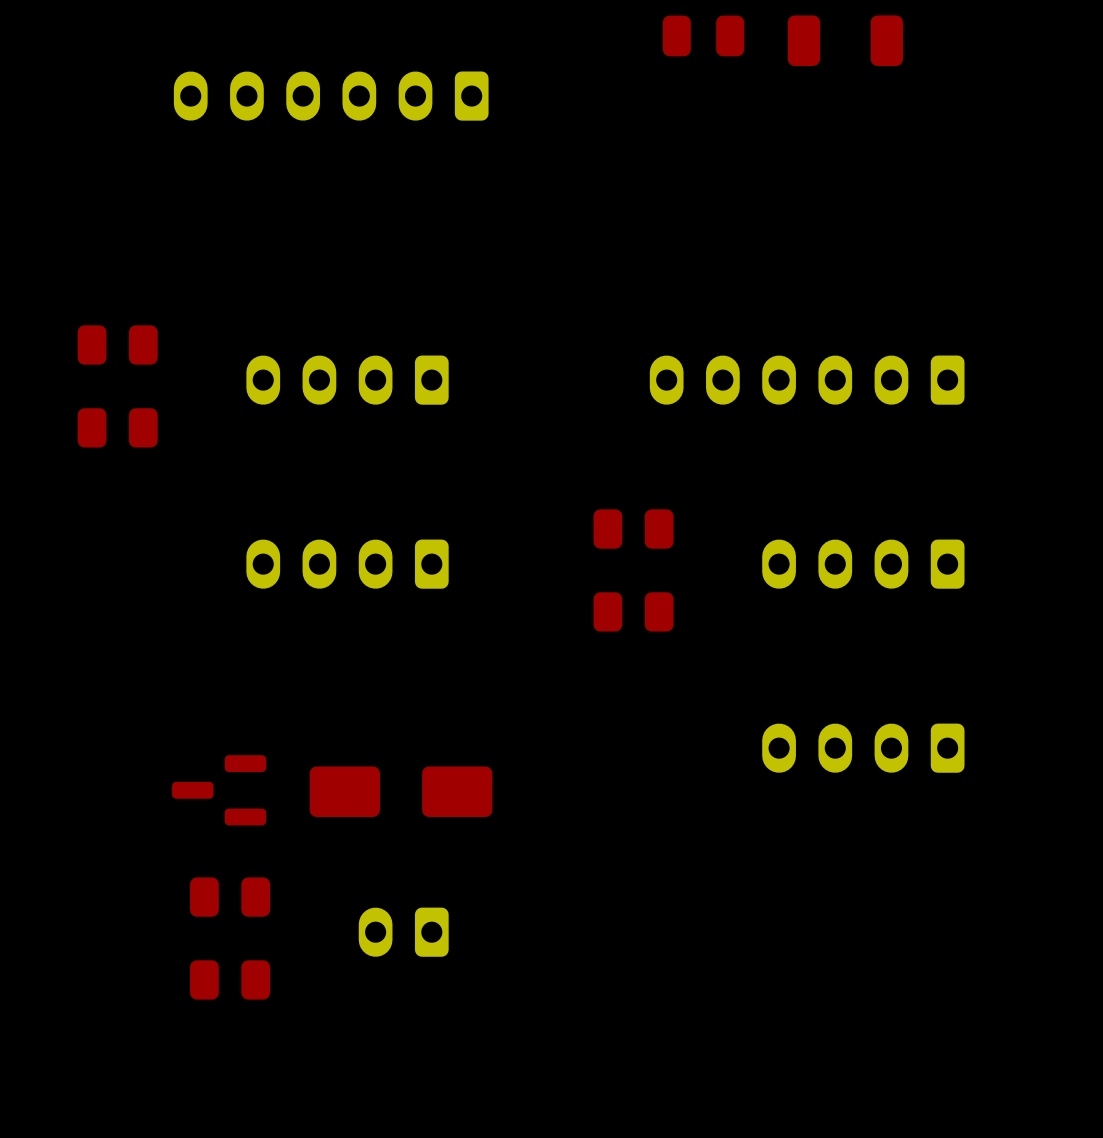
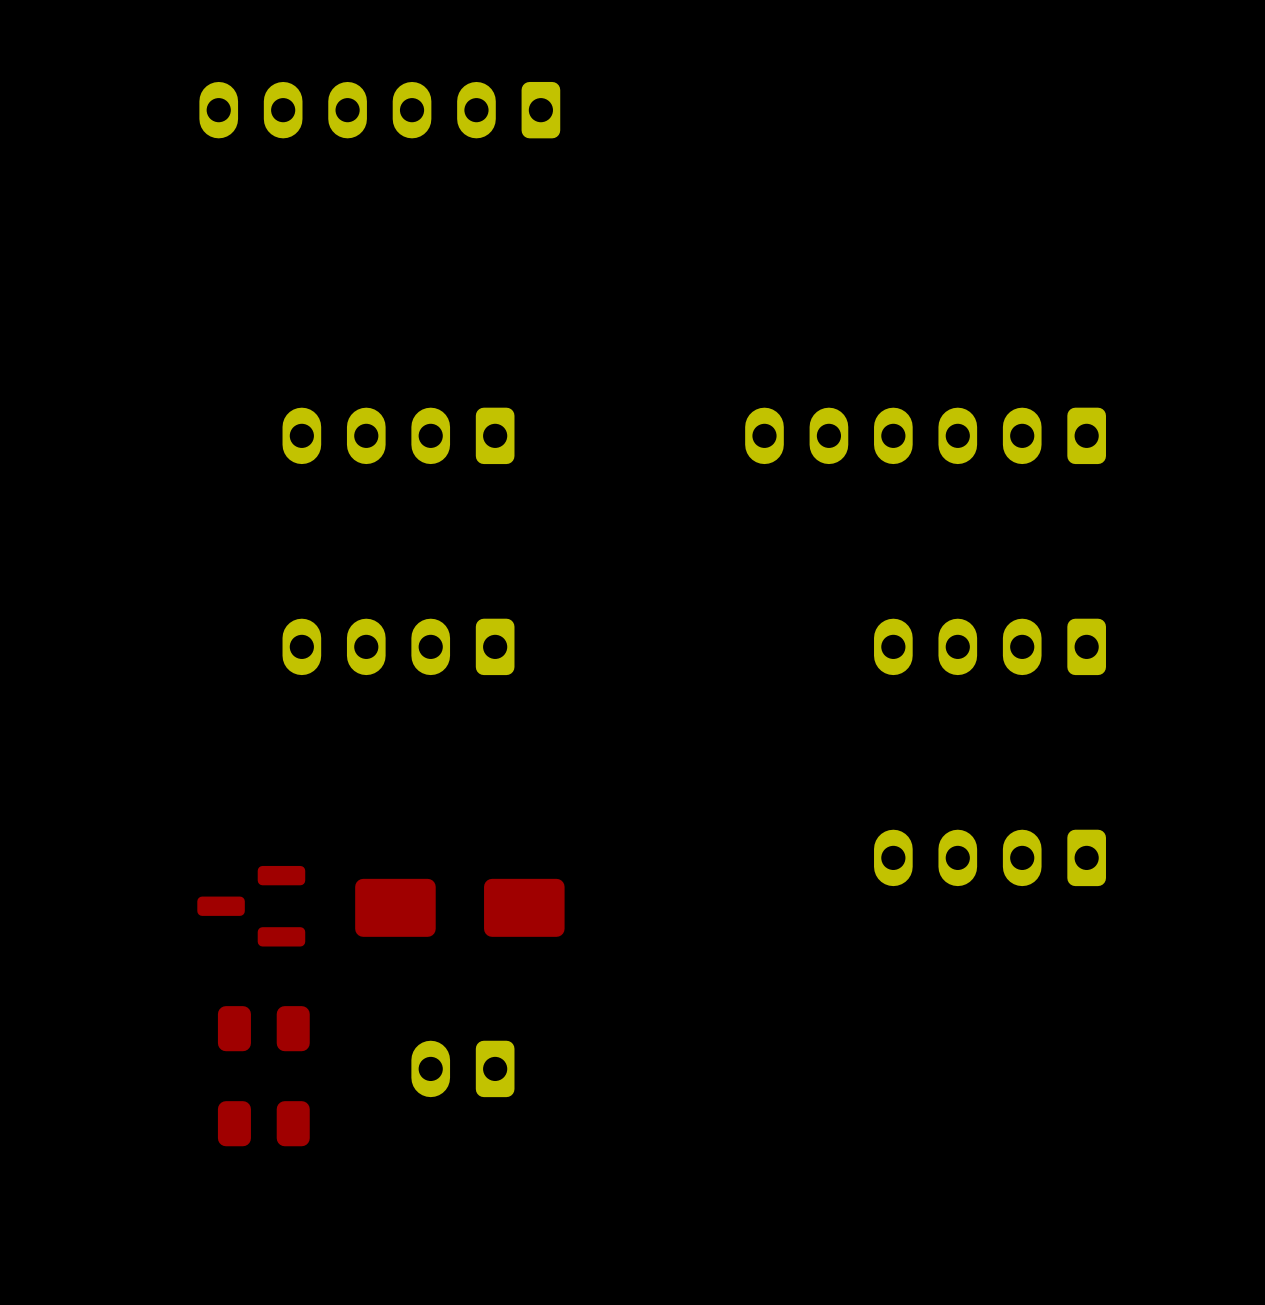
part: (703, 35) -> none
part: (845, 40) -> none
part: (117, 344) -> none
part: (117, 427) -> none
part: (633, 529) -> none
part: (633, 611) -> none

